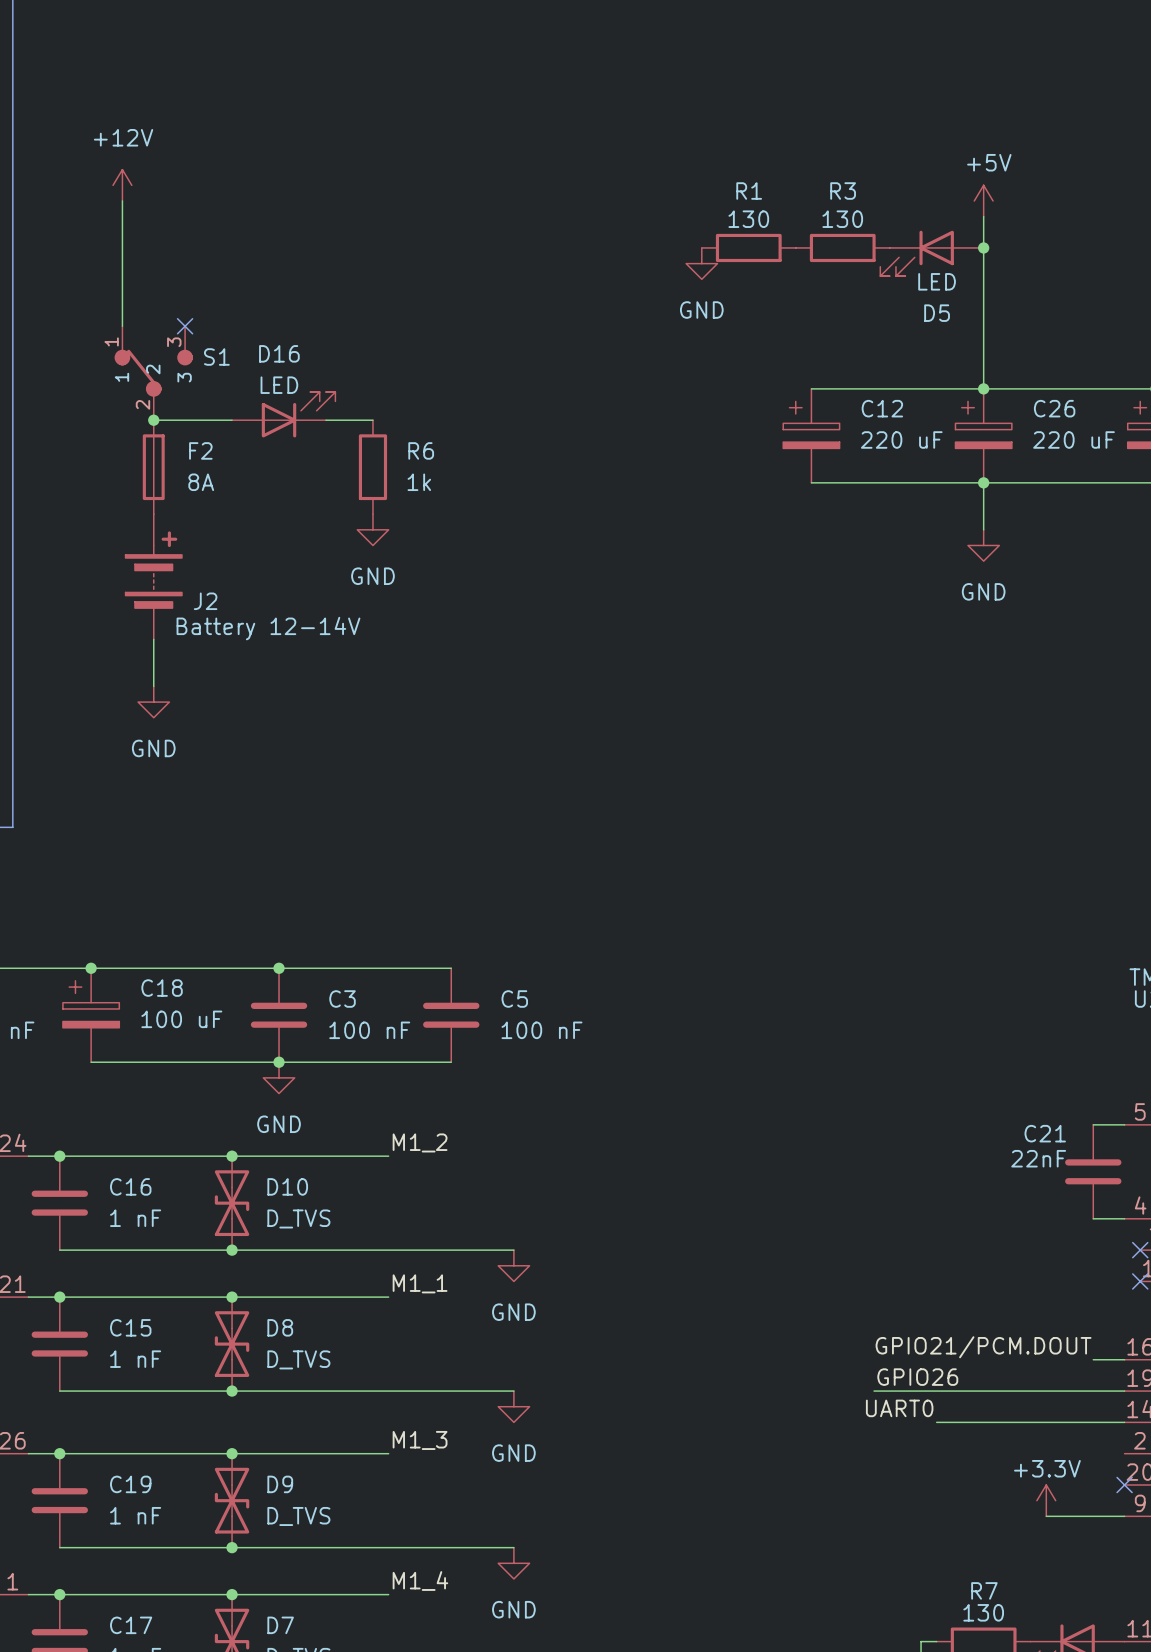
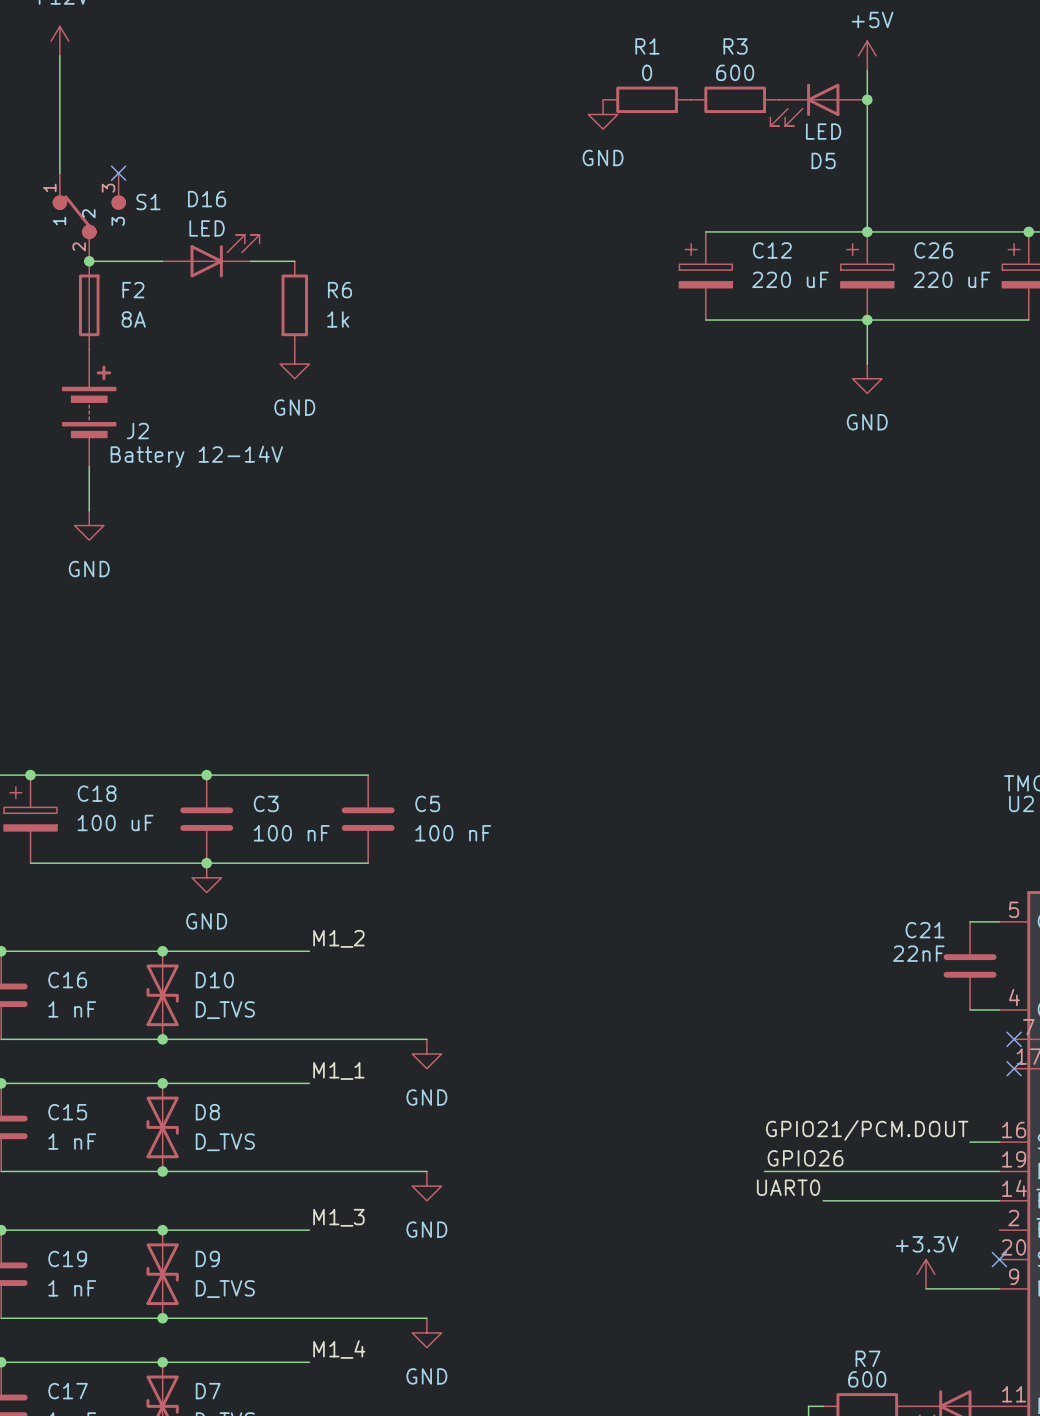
R1 value: 130 (748, 219) -> 0 (647, 72)
R3 value: 130 (842, 219) -> 600 (735, 72)
R7 value: 130 (983, 1612) -> 600 (867, 1379)

